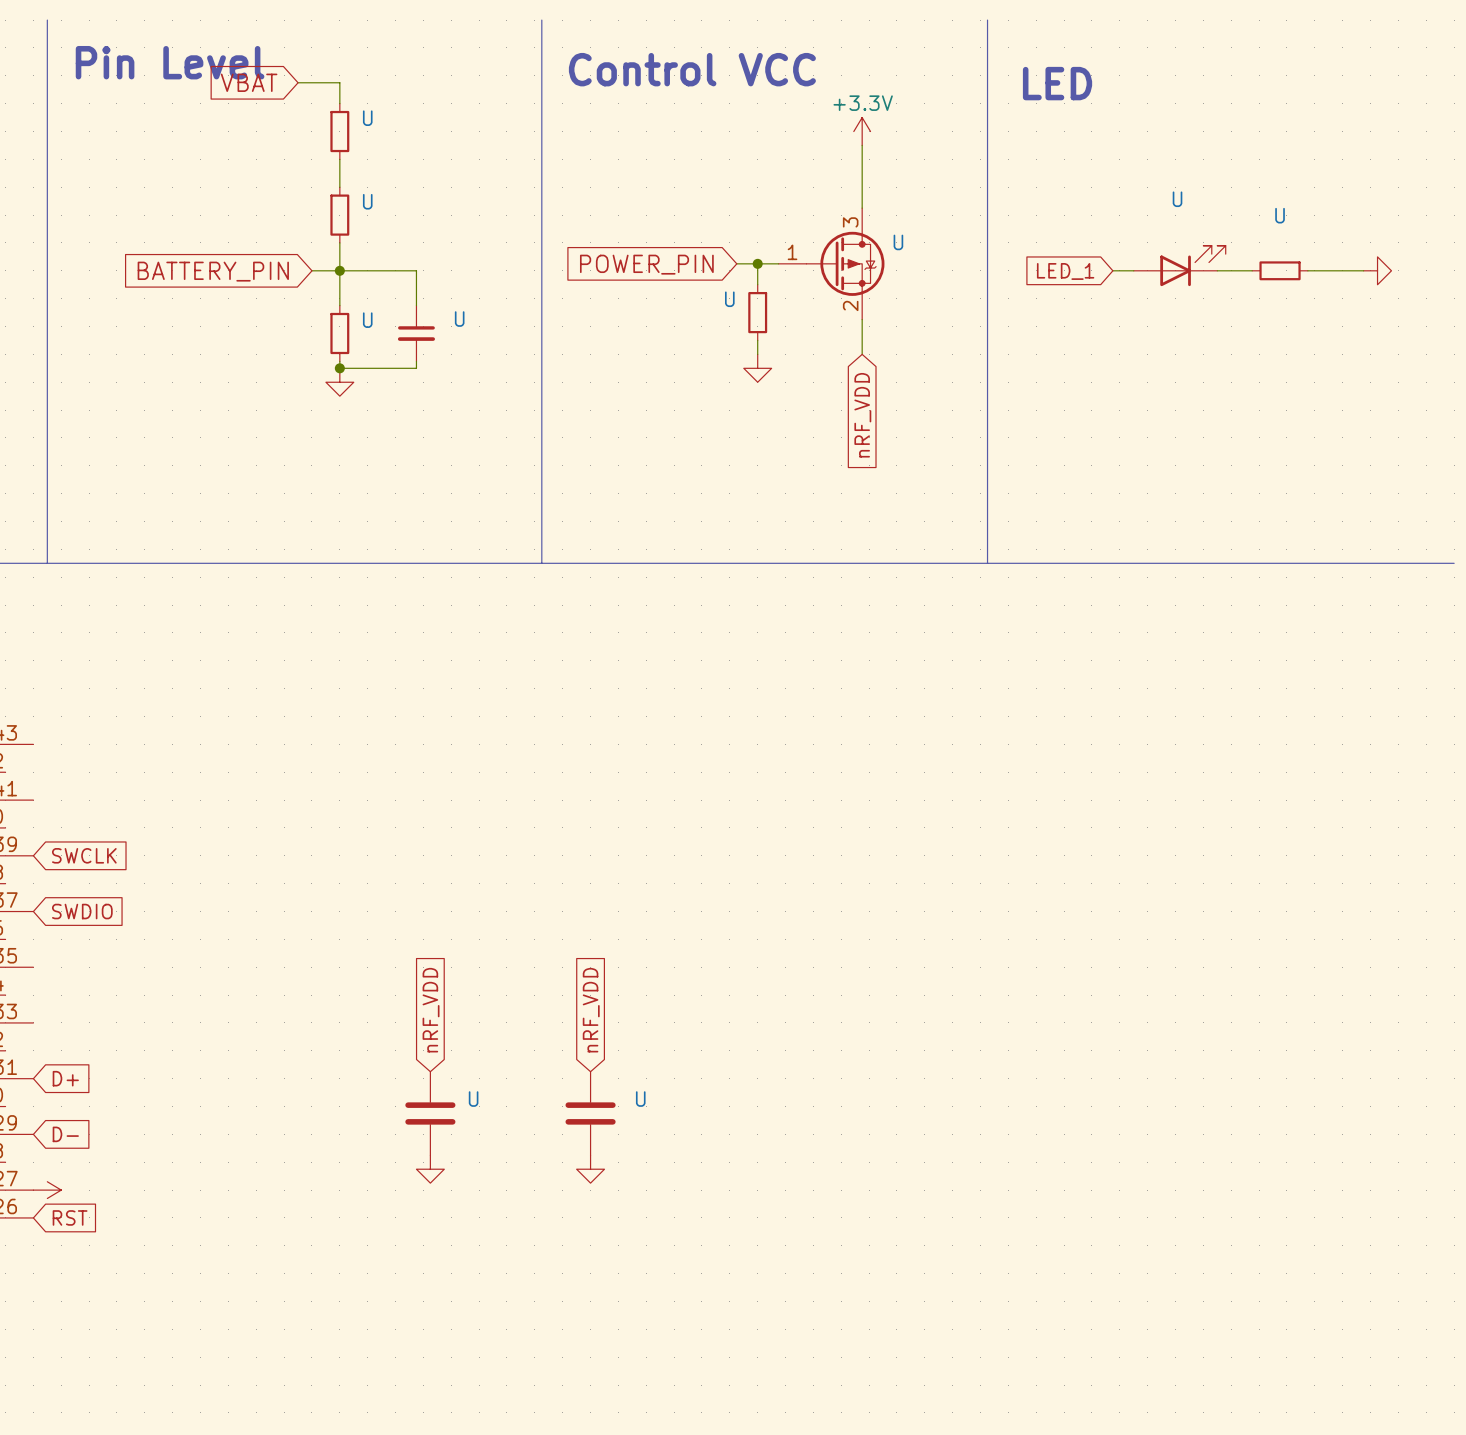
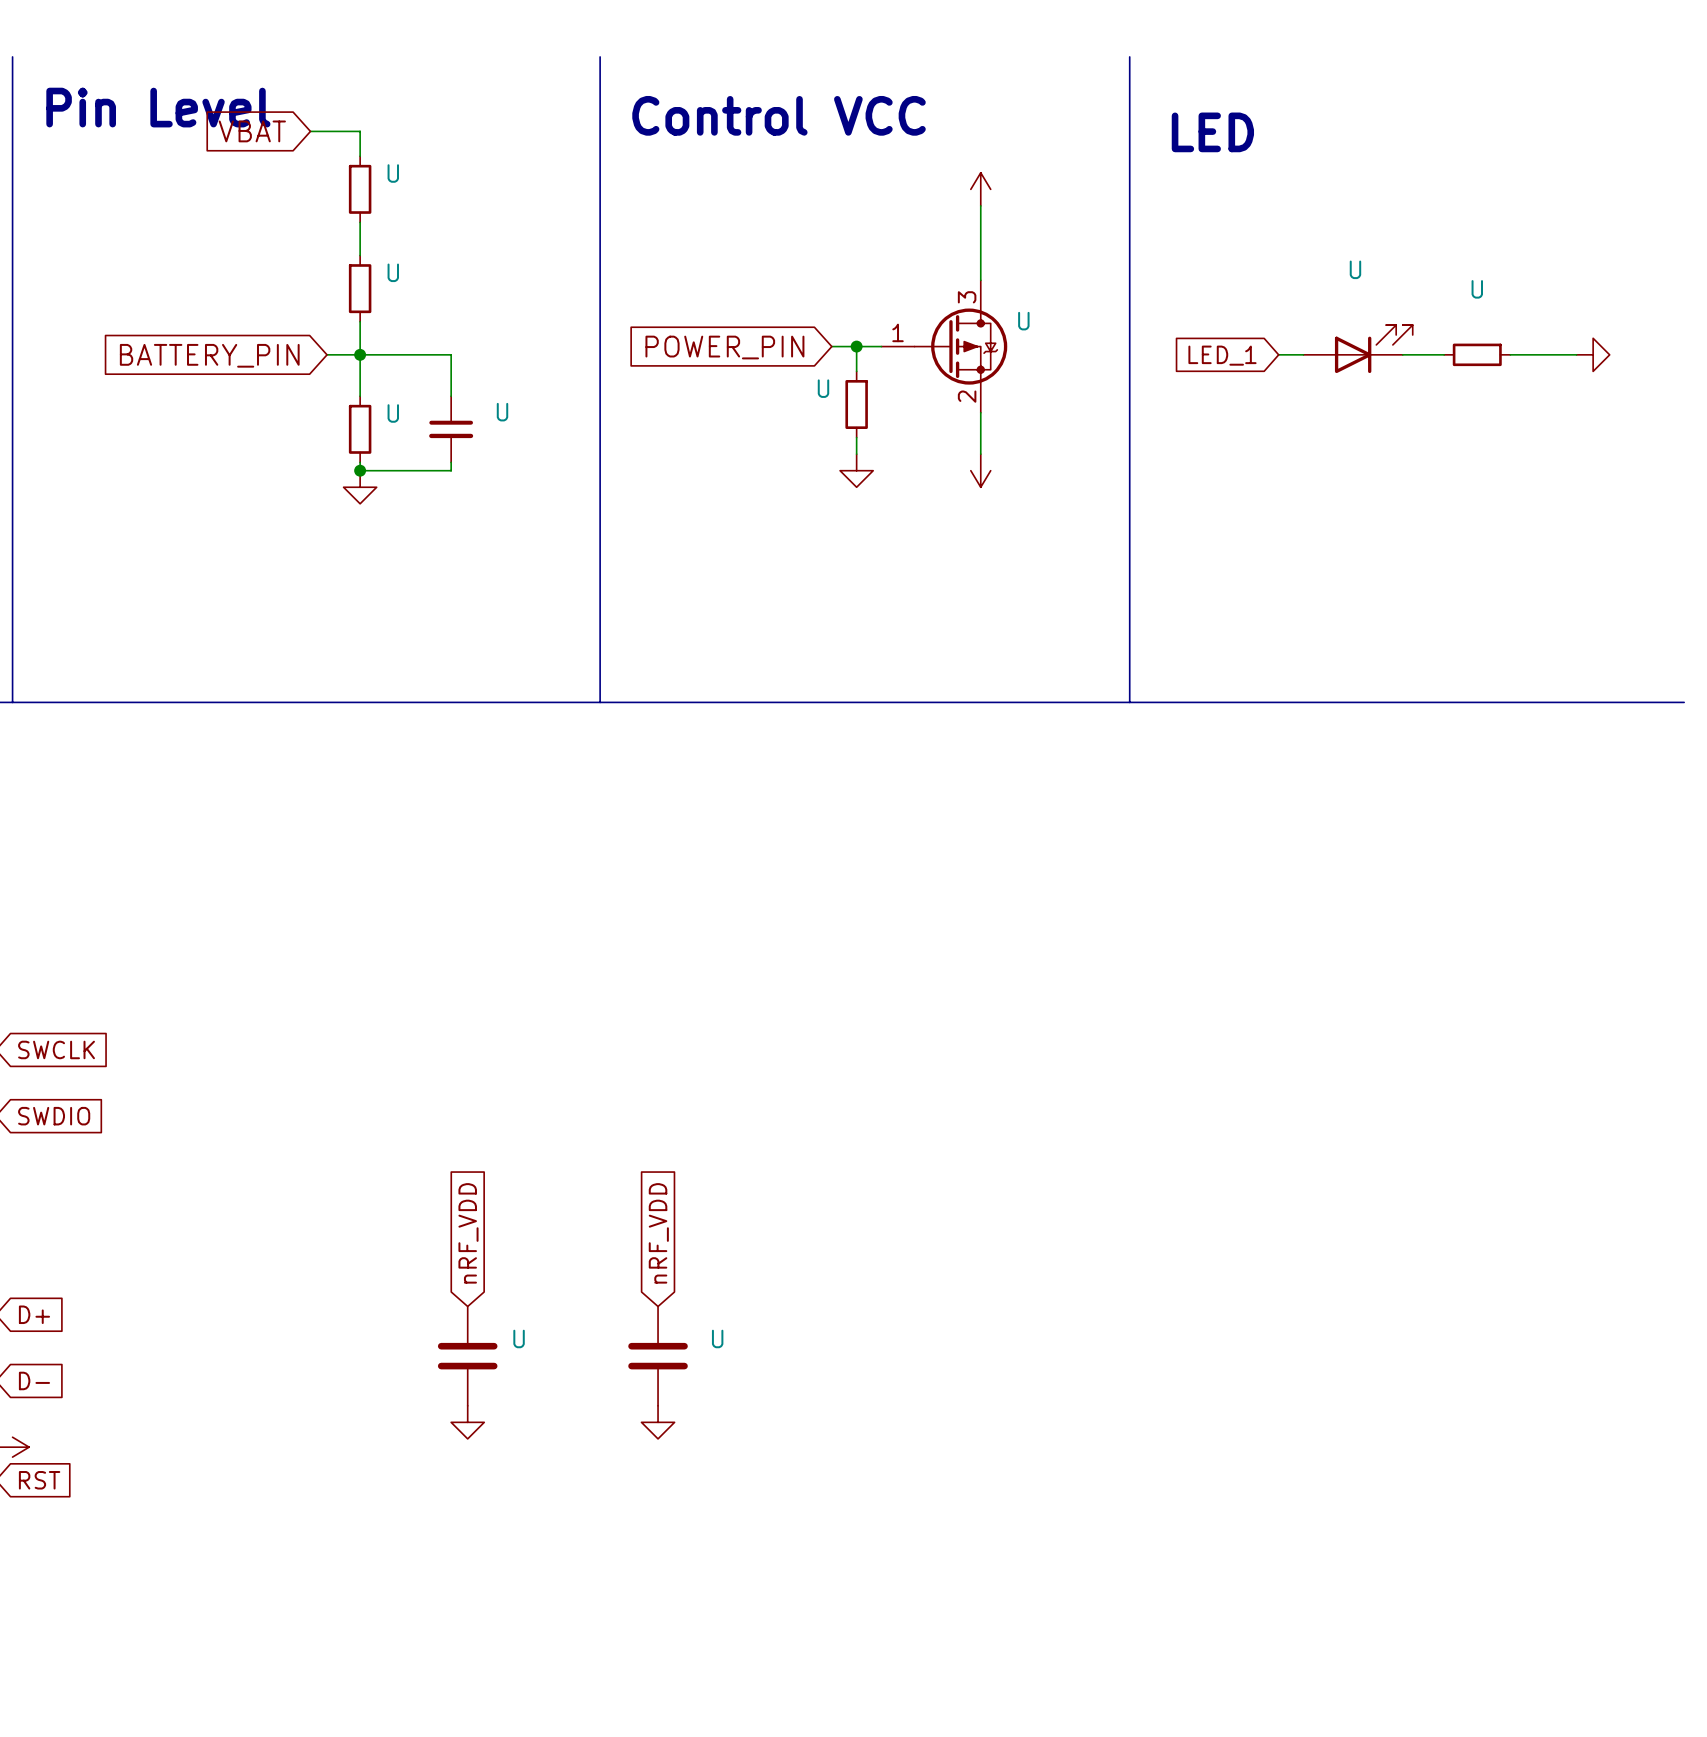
power symbol text: +3.3V (863, 103) -> none
power symbol: none -> (980, 470)
global label: nRF_VDD (862, 415) -> none

